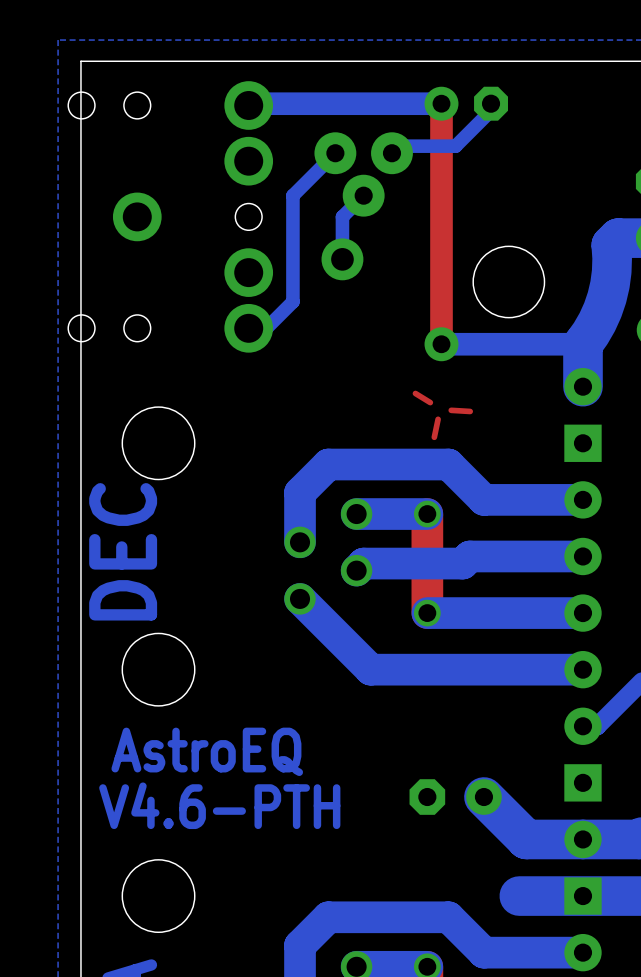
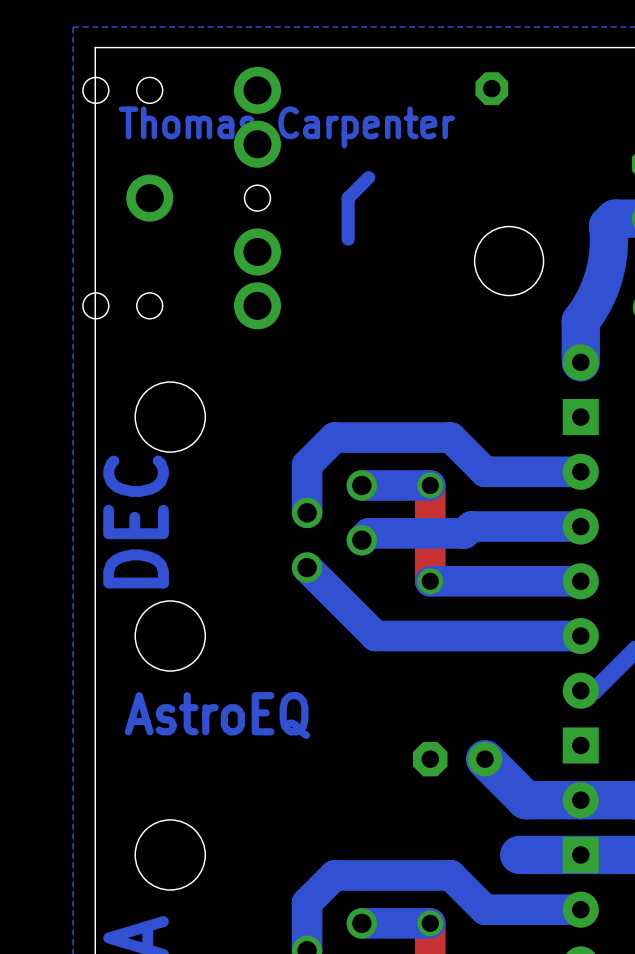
bottom track: (441, 103) (250, 103) (248, 105) -> none
top track: (441, 103) (441, 344) -> none
via: (441, 103) -> none
bottom track: (491, 103) (491, 110) (455, 146) (399, 146) (391, 153) -> none
text: none -> Thomas Carpenter (286, 127)
bottom track: (335, 153) (292, 195) (292, 301) (266, 328) (248, 328) -> none
part: (363, 174) -> none
part: (342, 259) -> none
via: (441, 344) -> none
bottom track: (582, 344) (441, 344) -> none
drawing: [412, 390, 474, 441] -> none
text: V4.6-PTH (219, 805) -> none

